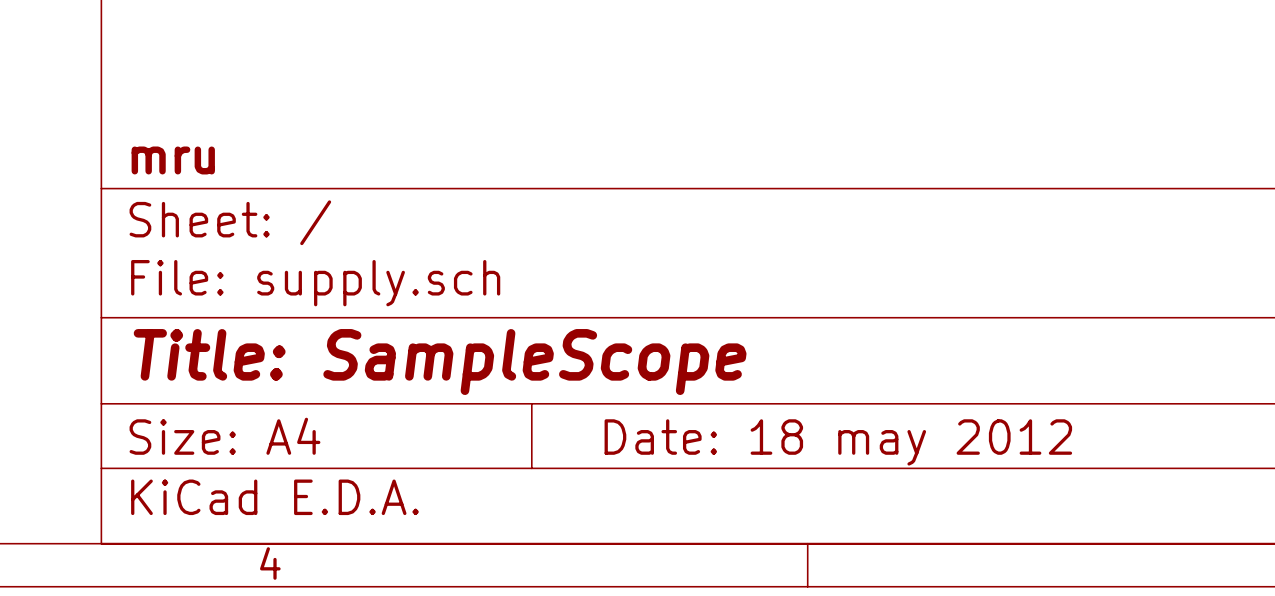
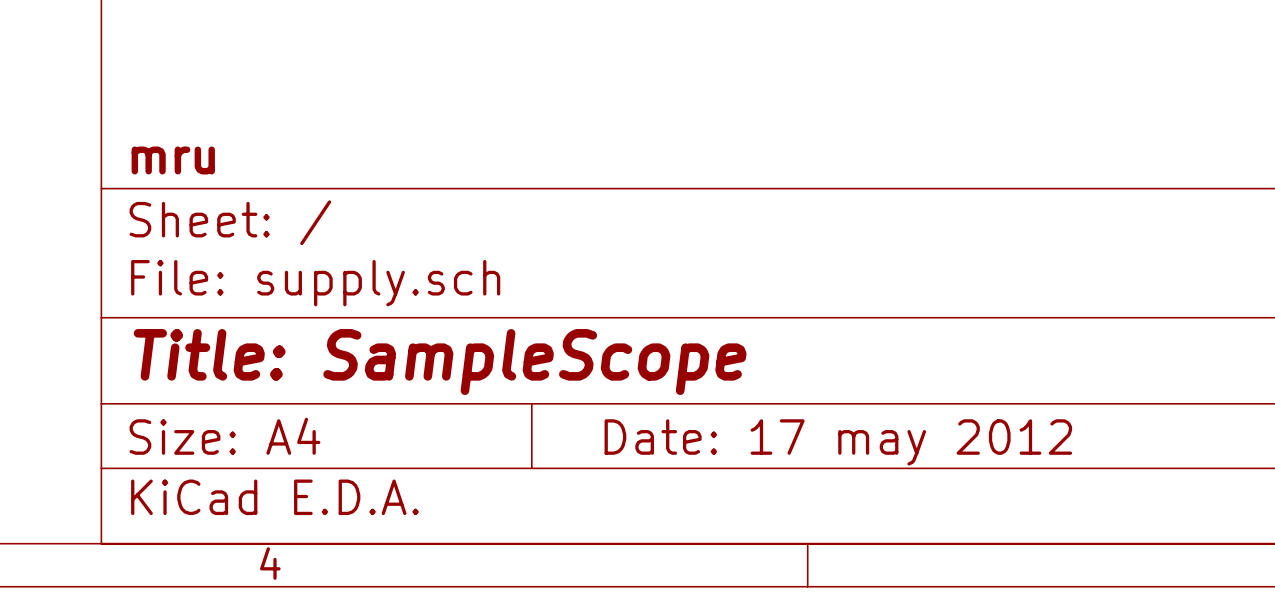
title block: Date: 18 may 2012 (838, 442) -> Date: 17 may 2012 (838, 442)

